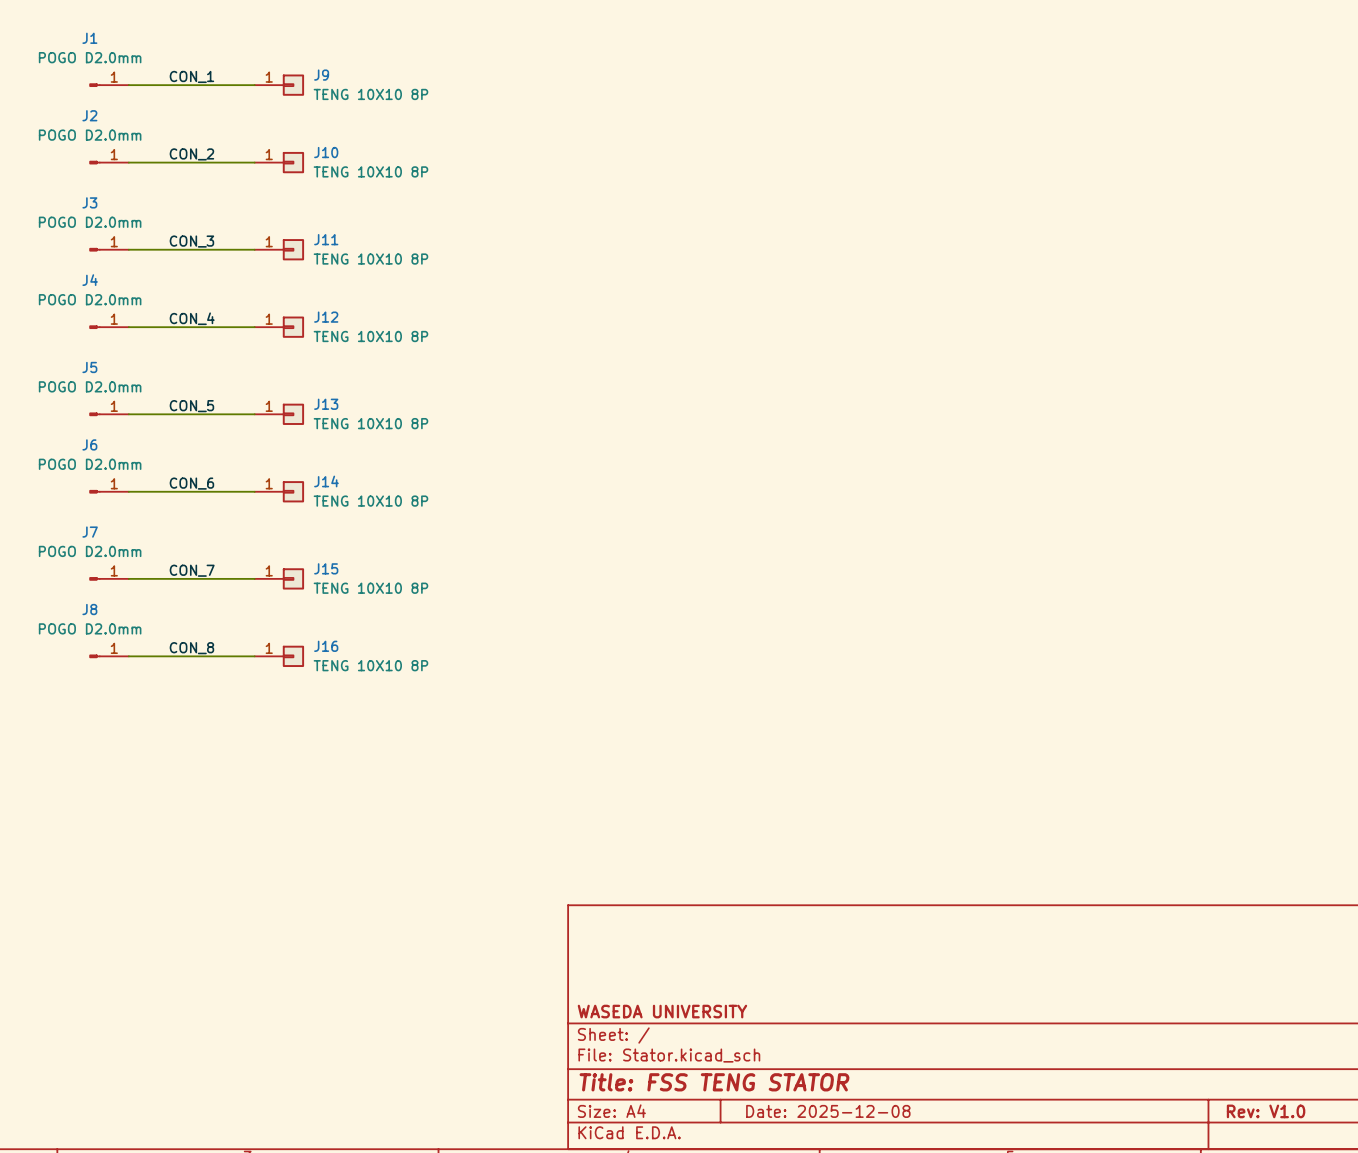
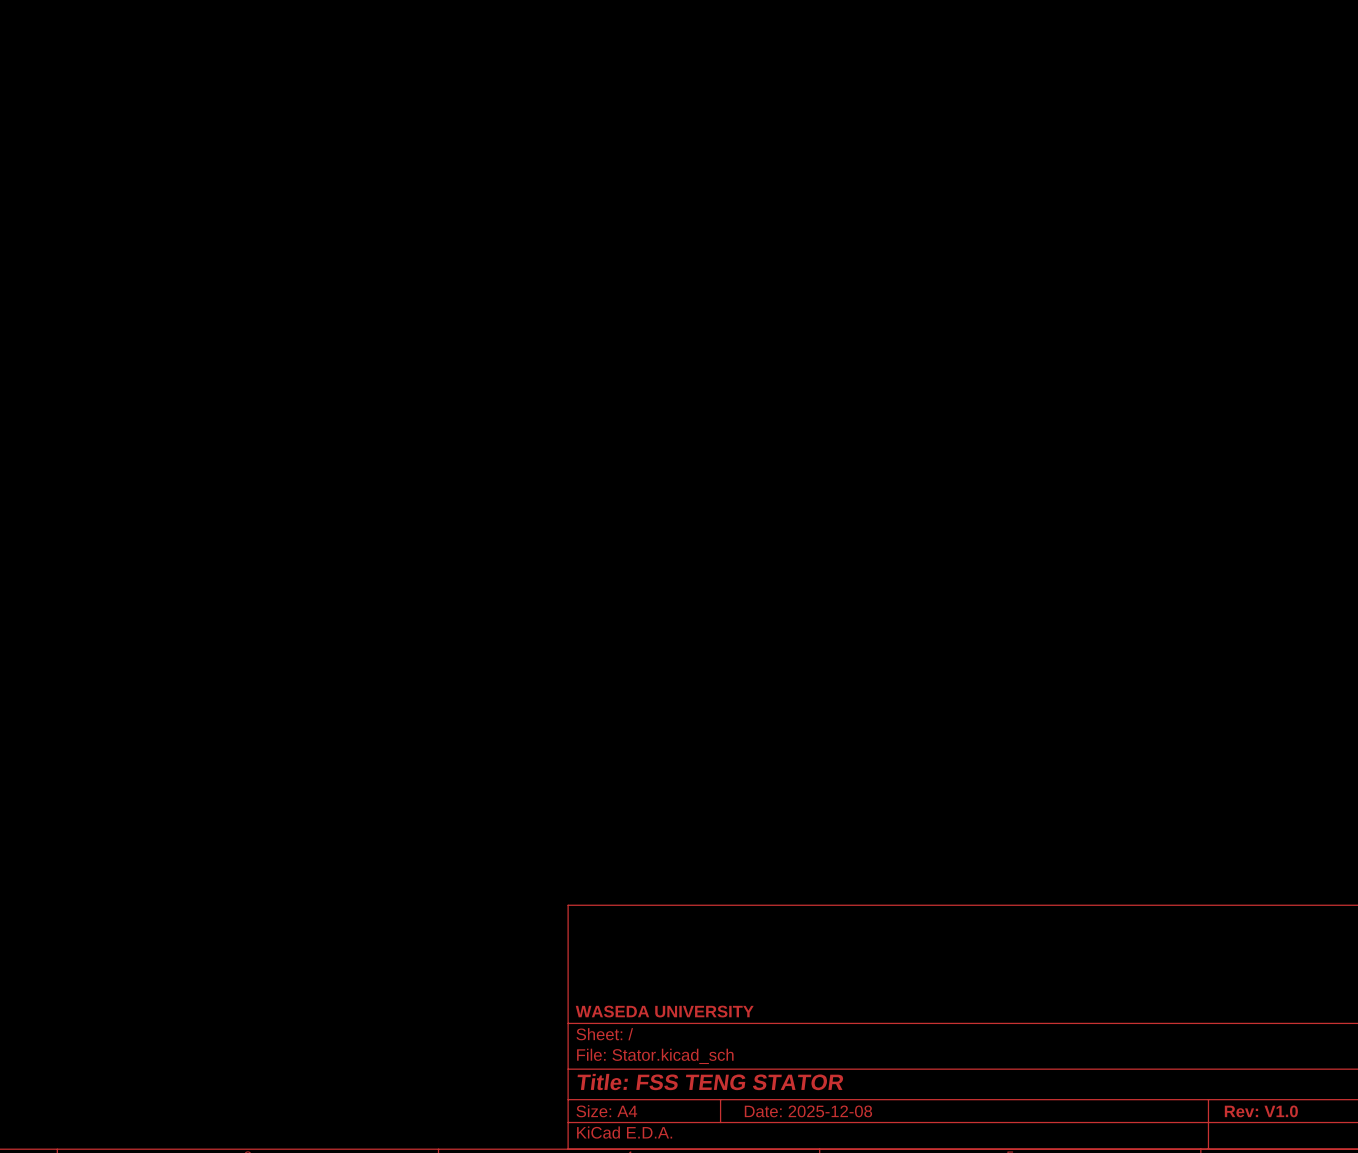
label: CON_1 (191, 76) -> none
J1: POGO D2.0mm (109, 85) -> none
wire: (128, 85) (254, 85) -> none
J9: TENG 10X10 8P (279, 85) -> none
label: CON_2 (191, 154) -> none
J2: POGO D2.0mm (109, 162) -> none
wire: (128, 162) (254, 162) -> none
J10: TENG 10X10 8P (279, 162) -> none
label: CON_3 (191, 241) -> none
J3: POGO D2.0mm (109, 249) -> none
wire: (128, 249) (254, 249) -> none
J11: TENG 10X10 8P (279, 249) -> none
label: CON_4 (192, 318) -> none
J4: POGO D2.0mm (109, 327) -> none
wire: (128, 327) (254, 327) -> none
J12: TENG 10X10 8P (279, 327) -> none
label: CON_5 (191, 406) -> none
J5: POGO D2.0mm (109, 414) -> none
wire: (128, 414) (254, 414) -> none
J13: TENG 10X10 8P (279, 414) -> none
label: CON_6 (191, 483) -> none
J6: POGO D2.0mm (109, 491) -> none
wire: (128, 491) (254, 491) -> none
J14: TENG 10X10 8P (279, 491) -> none
label: CON_7 (192, 570) -> none
J7: POGO D2.0mm (109, 578) -> none
wire: (128, 578) (254, 578) -> none
J15: TENG 10X10 8P (279, 578) -> none
label: CON_8 (191, 648) -> none
J8: POGO D2.0mm (109, 656) -> none
wire: (128, 656) (254, 656) -> none
J16: TENG 10X10 8P (279, 656) -> none

